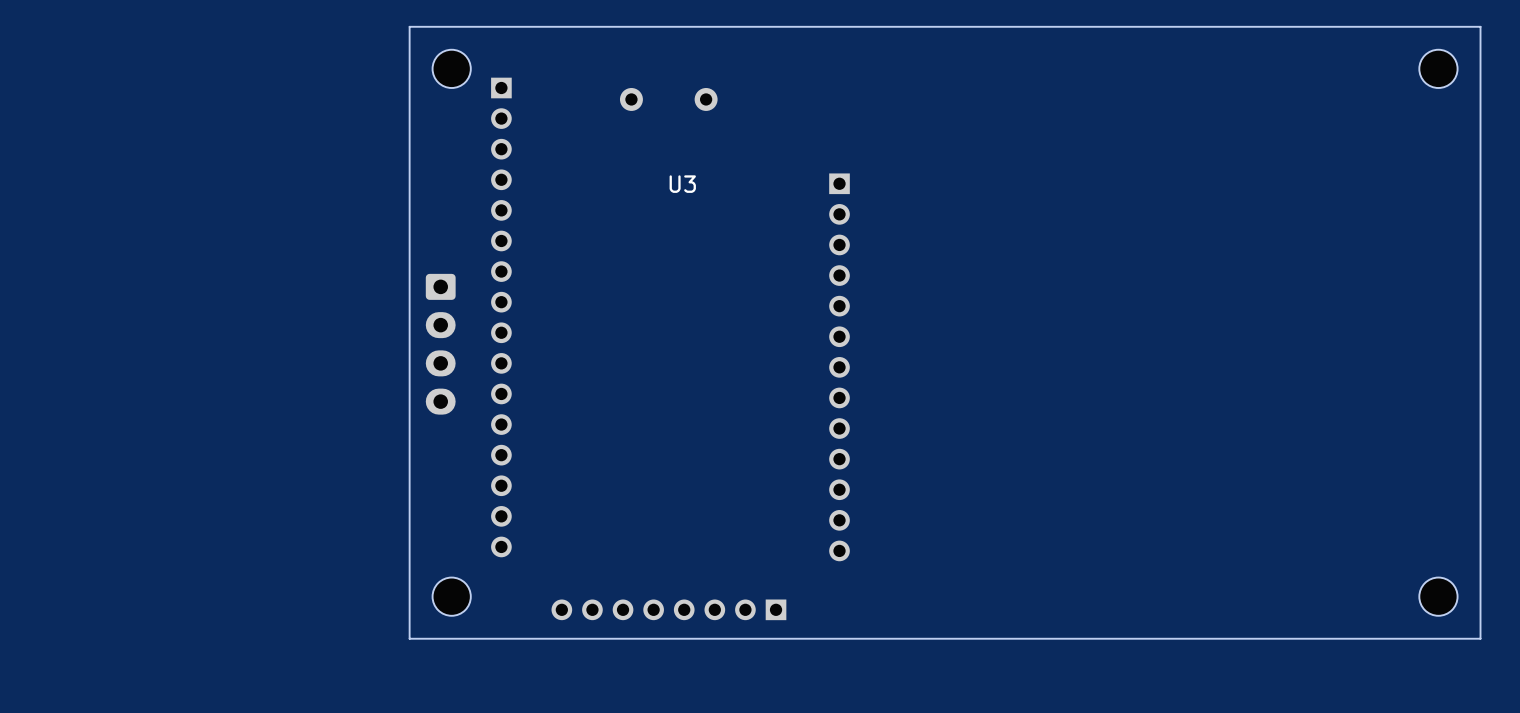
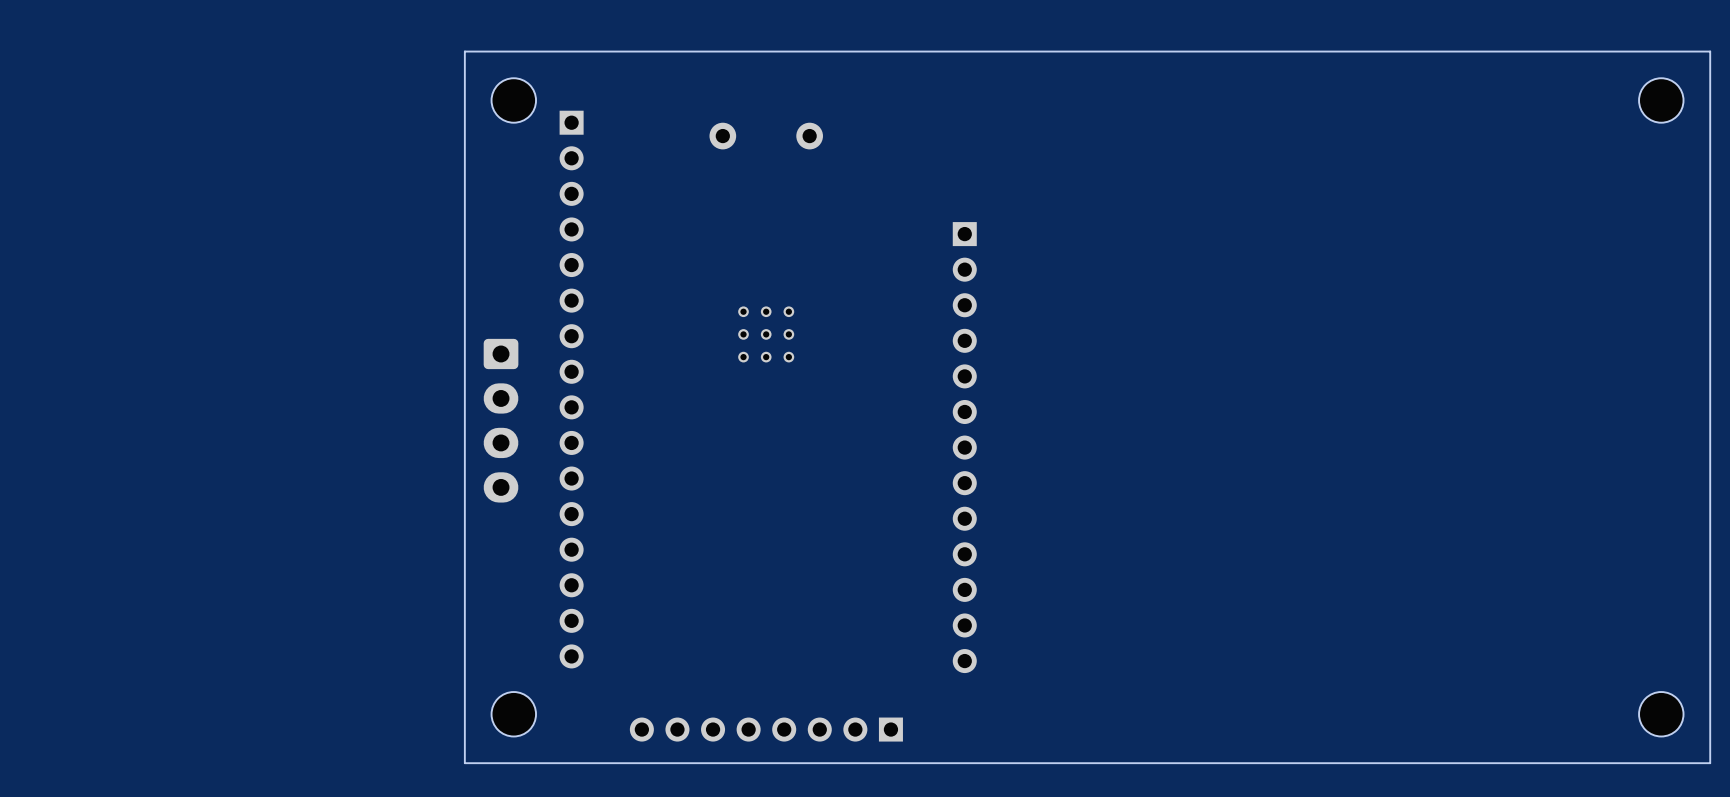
U3: (682, 184) -> none
part: none -> (766, 334)

